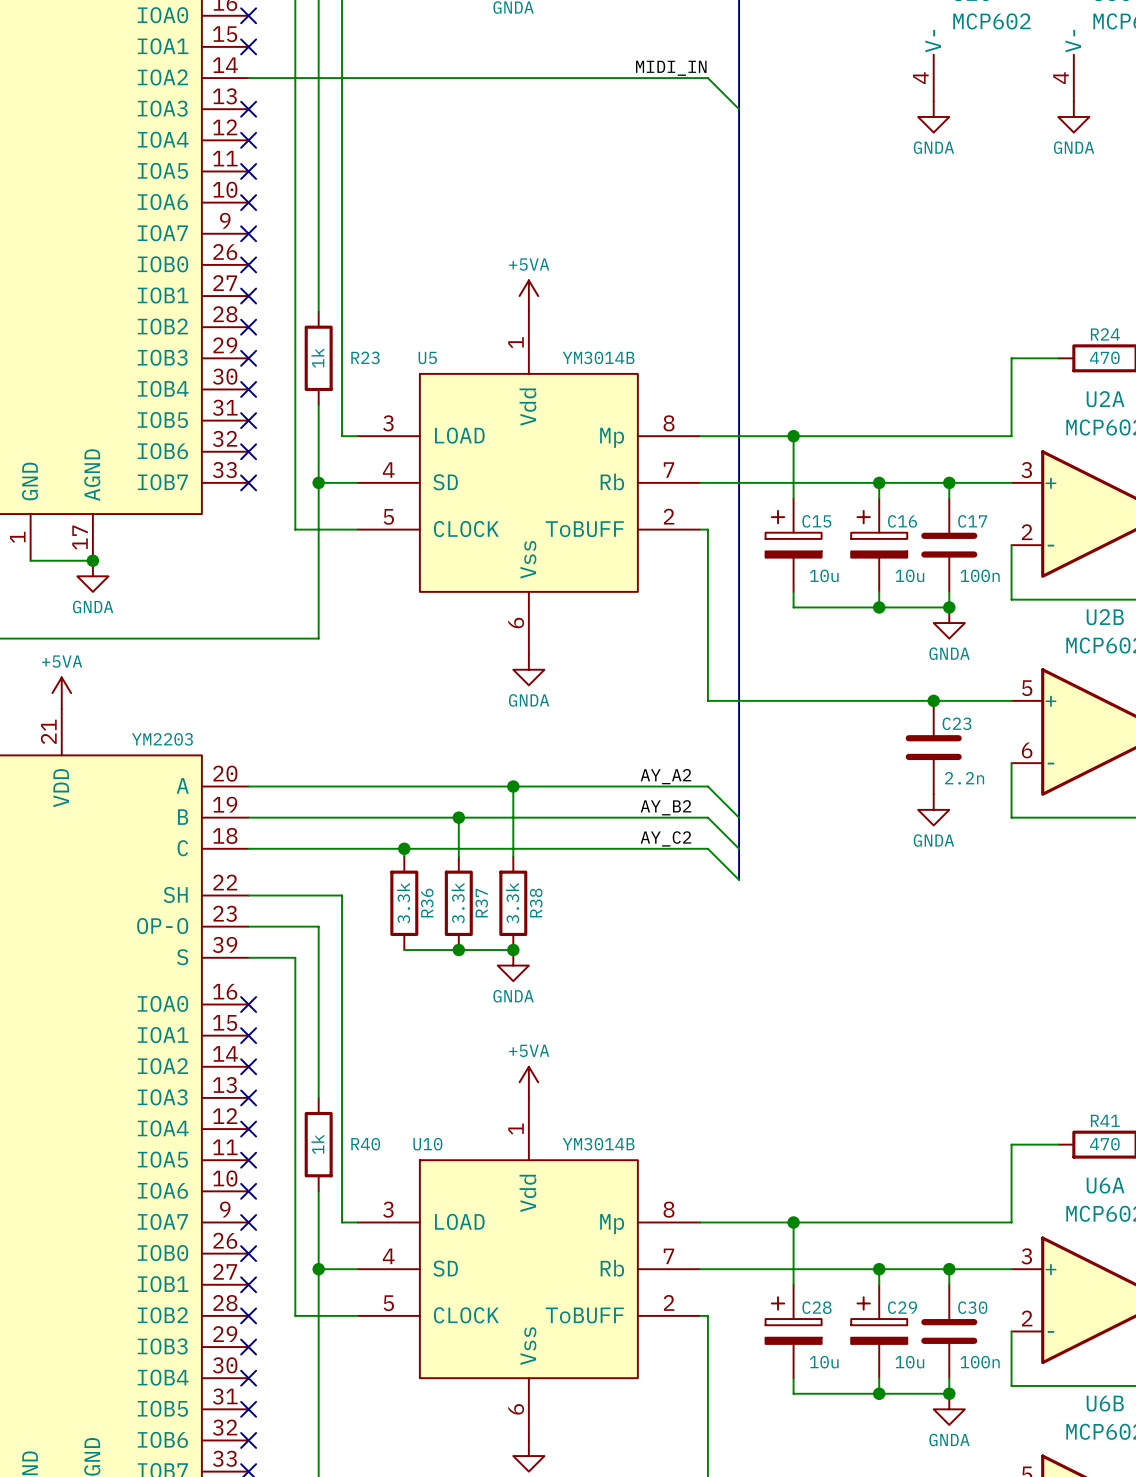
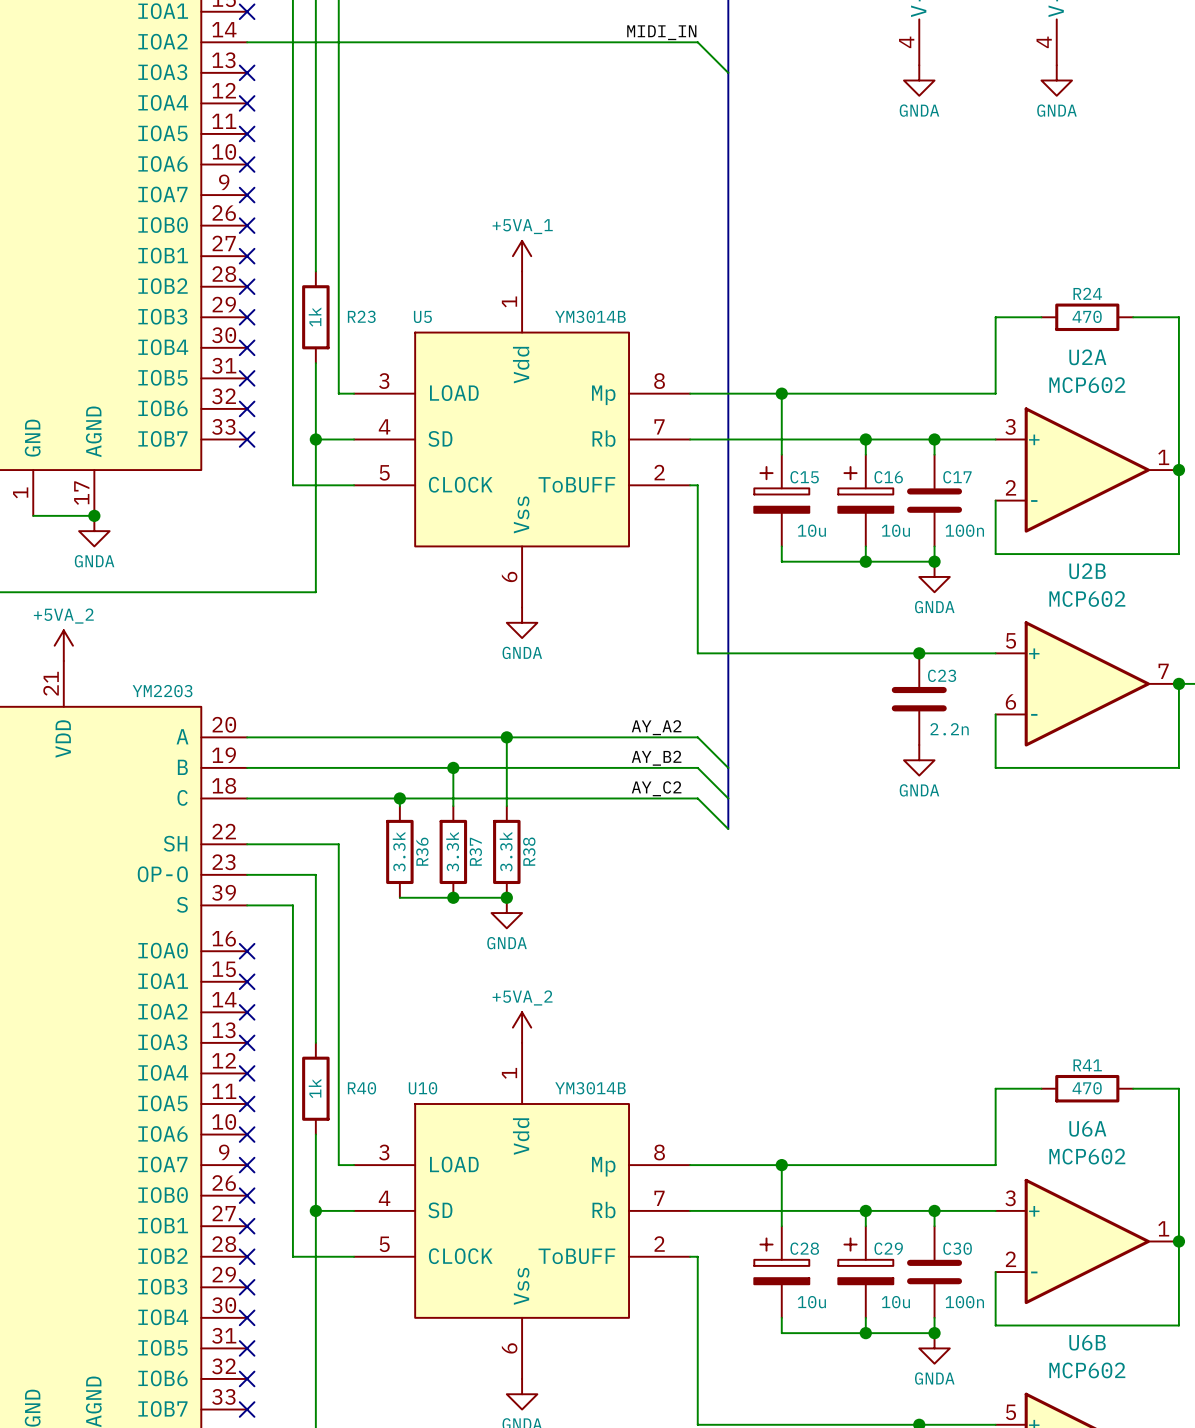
power symbol: +5VA (528, 296) -> +5VA_1 (522, 256)
power symbol: +5VA (61, 693) -> +5VA_2 (63, 645)
power symbol: +5VA (528, 1082) -> +5VA_2 (522, 1027)

